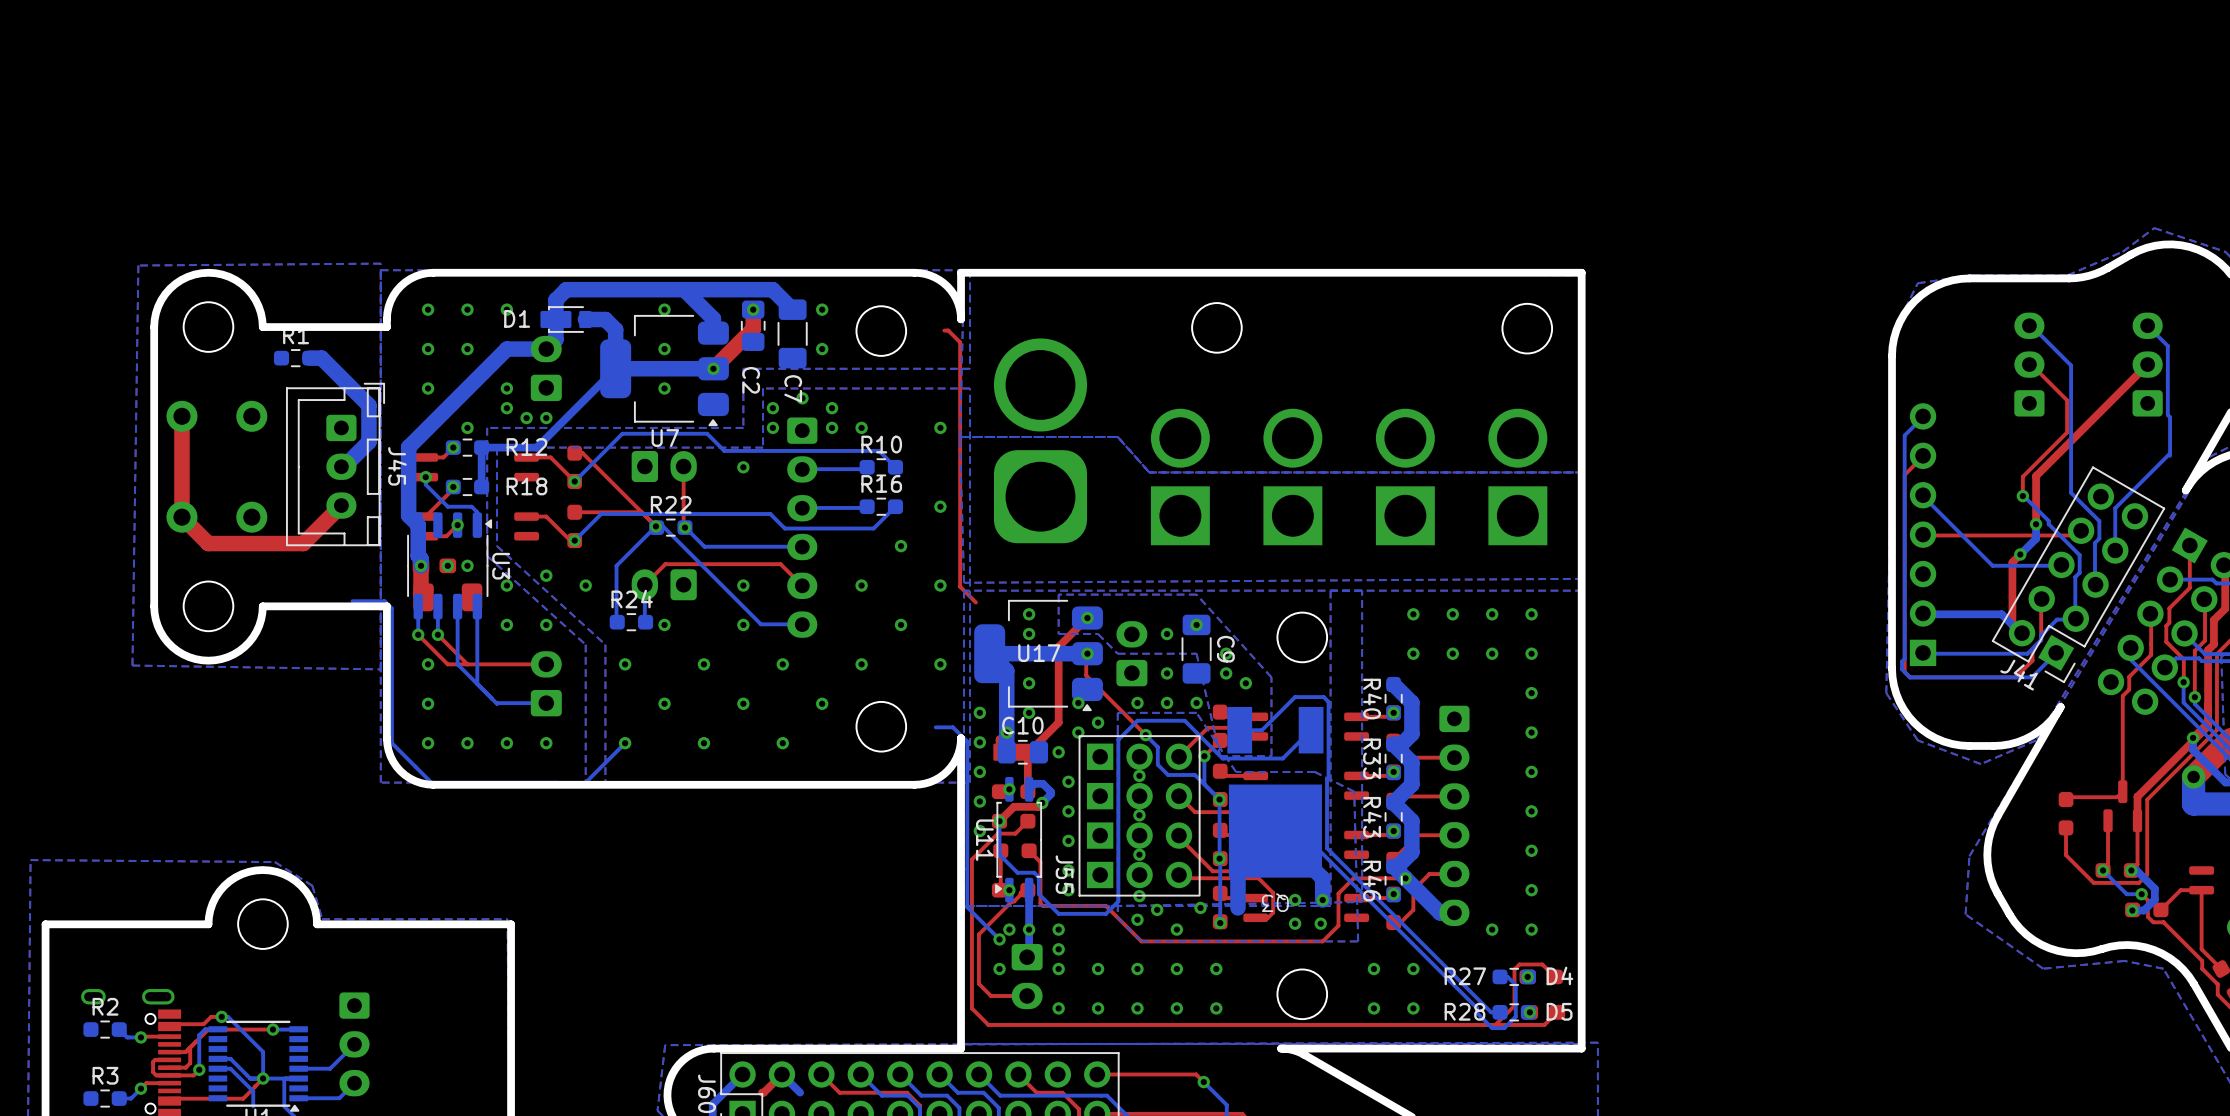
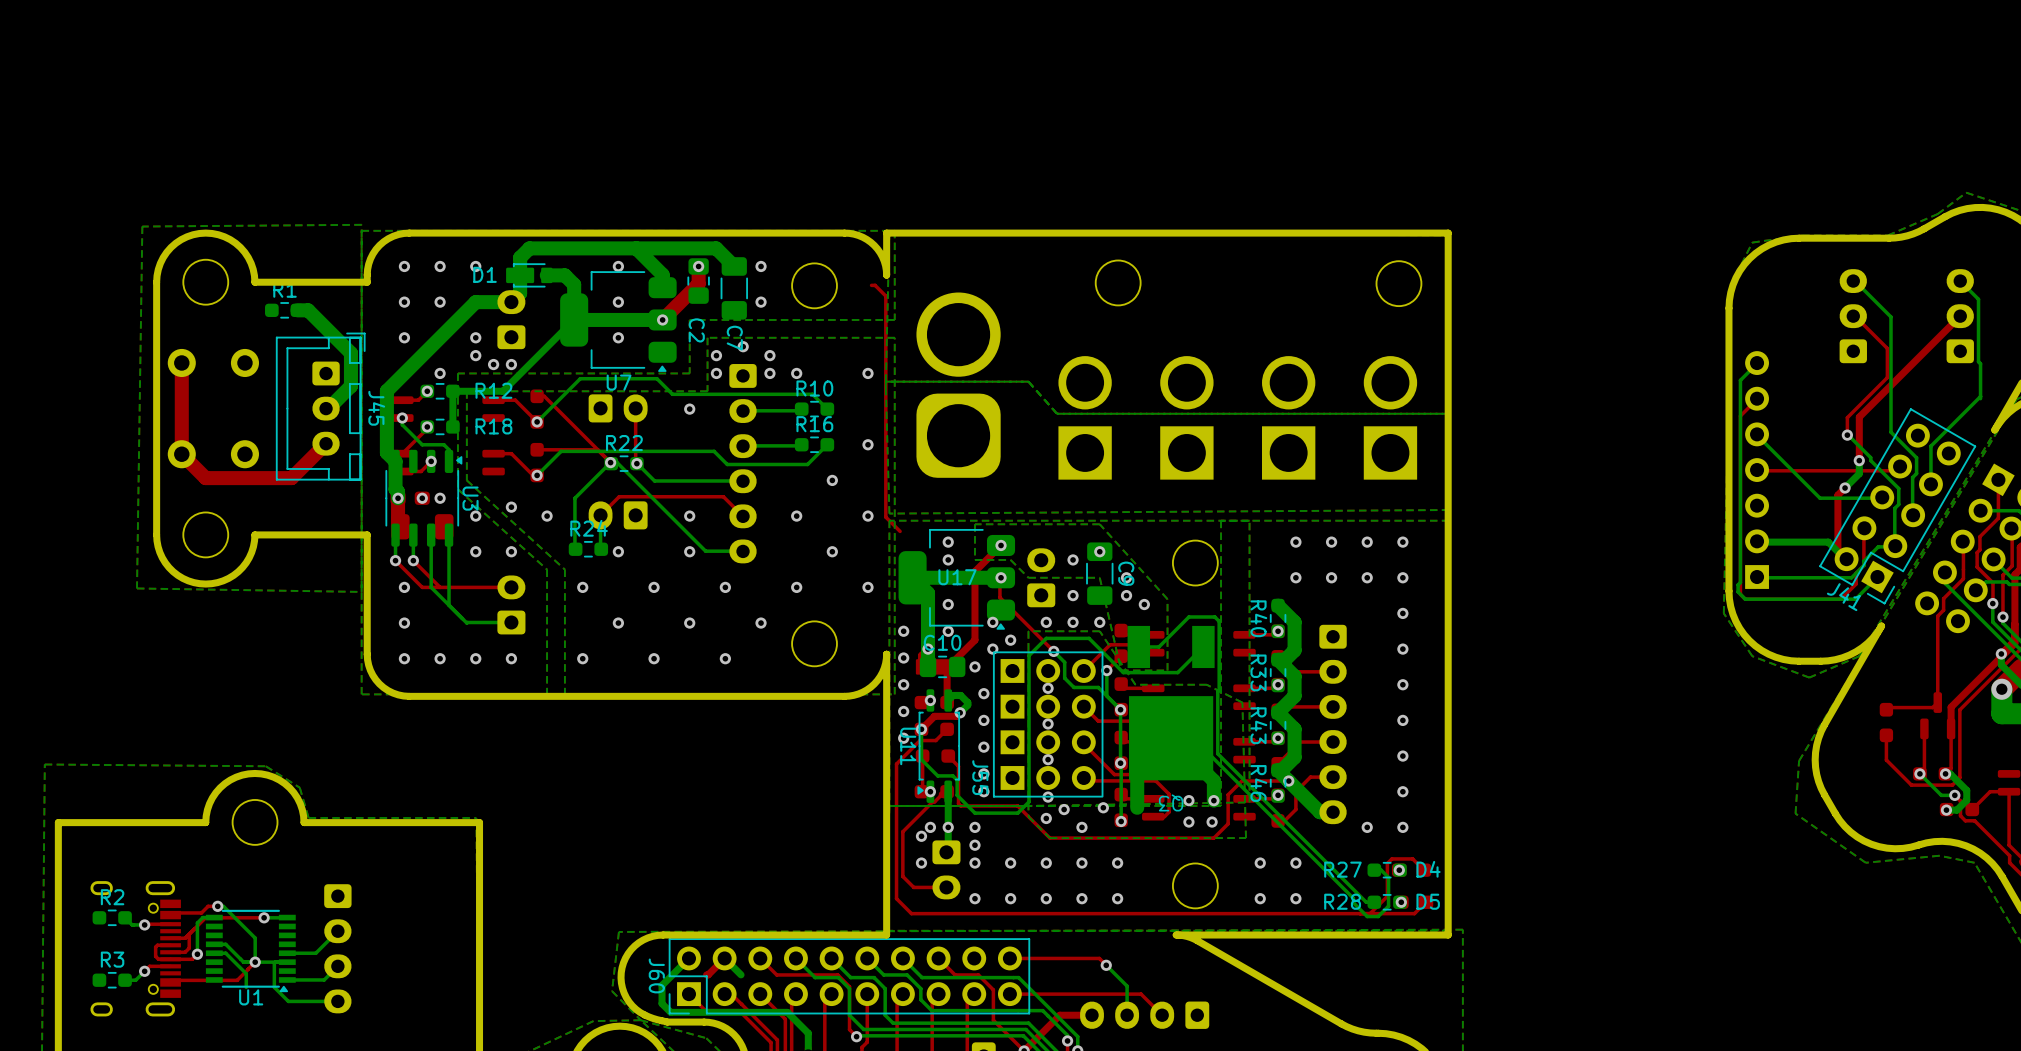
bottom track: (352, 601) (384, 601) (391, 608) (391, 743) (431, 782) (557, 782) -> none
bottom track: (935, 727) (953, 727) (967, 741) (967, 907) (999, 939) -> none
bottom track: (625, 743) (585, 782) (557, 782) -> none

